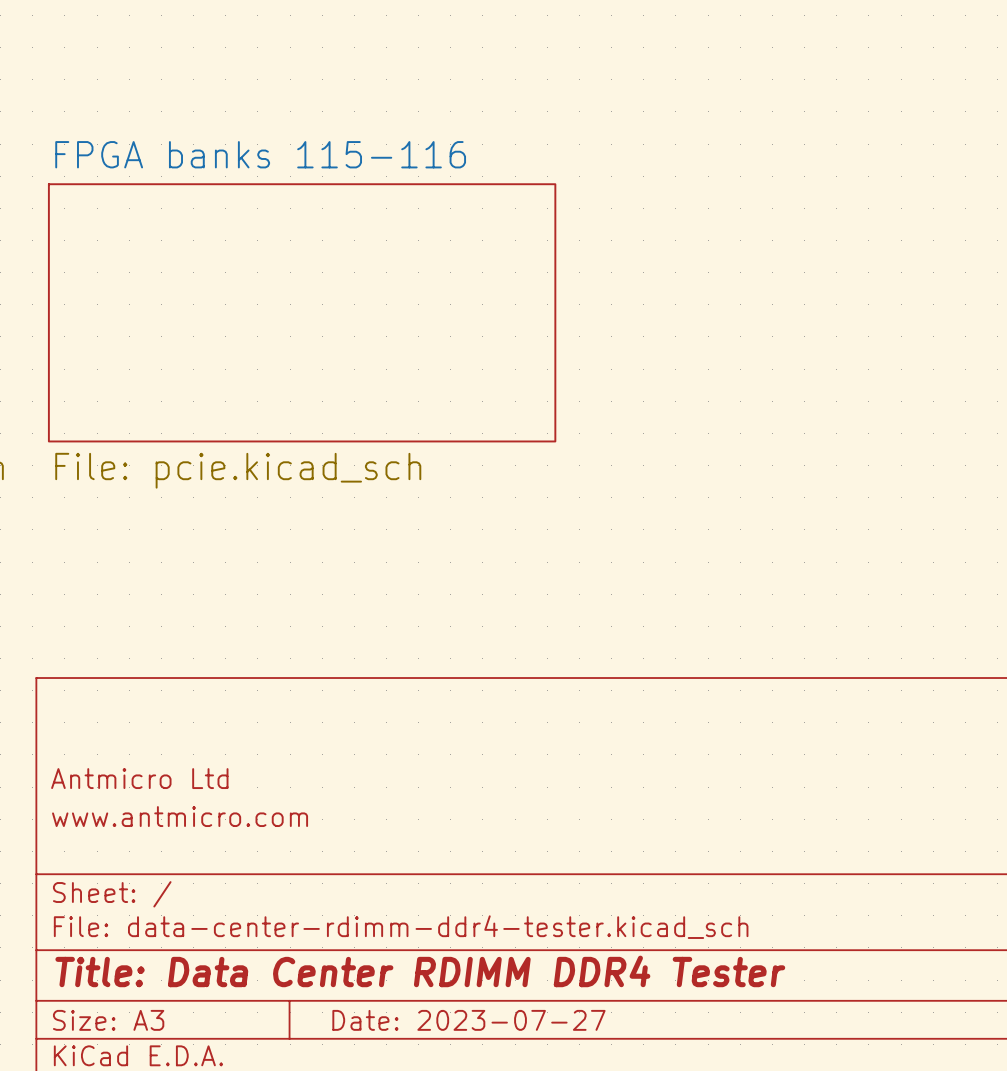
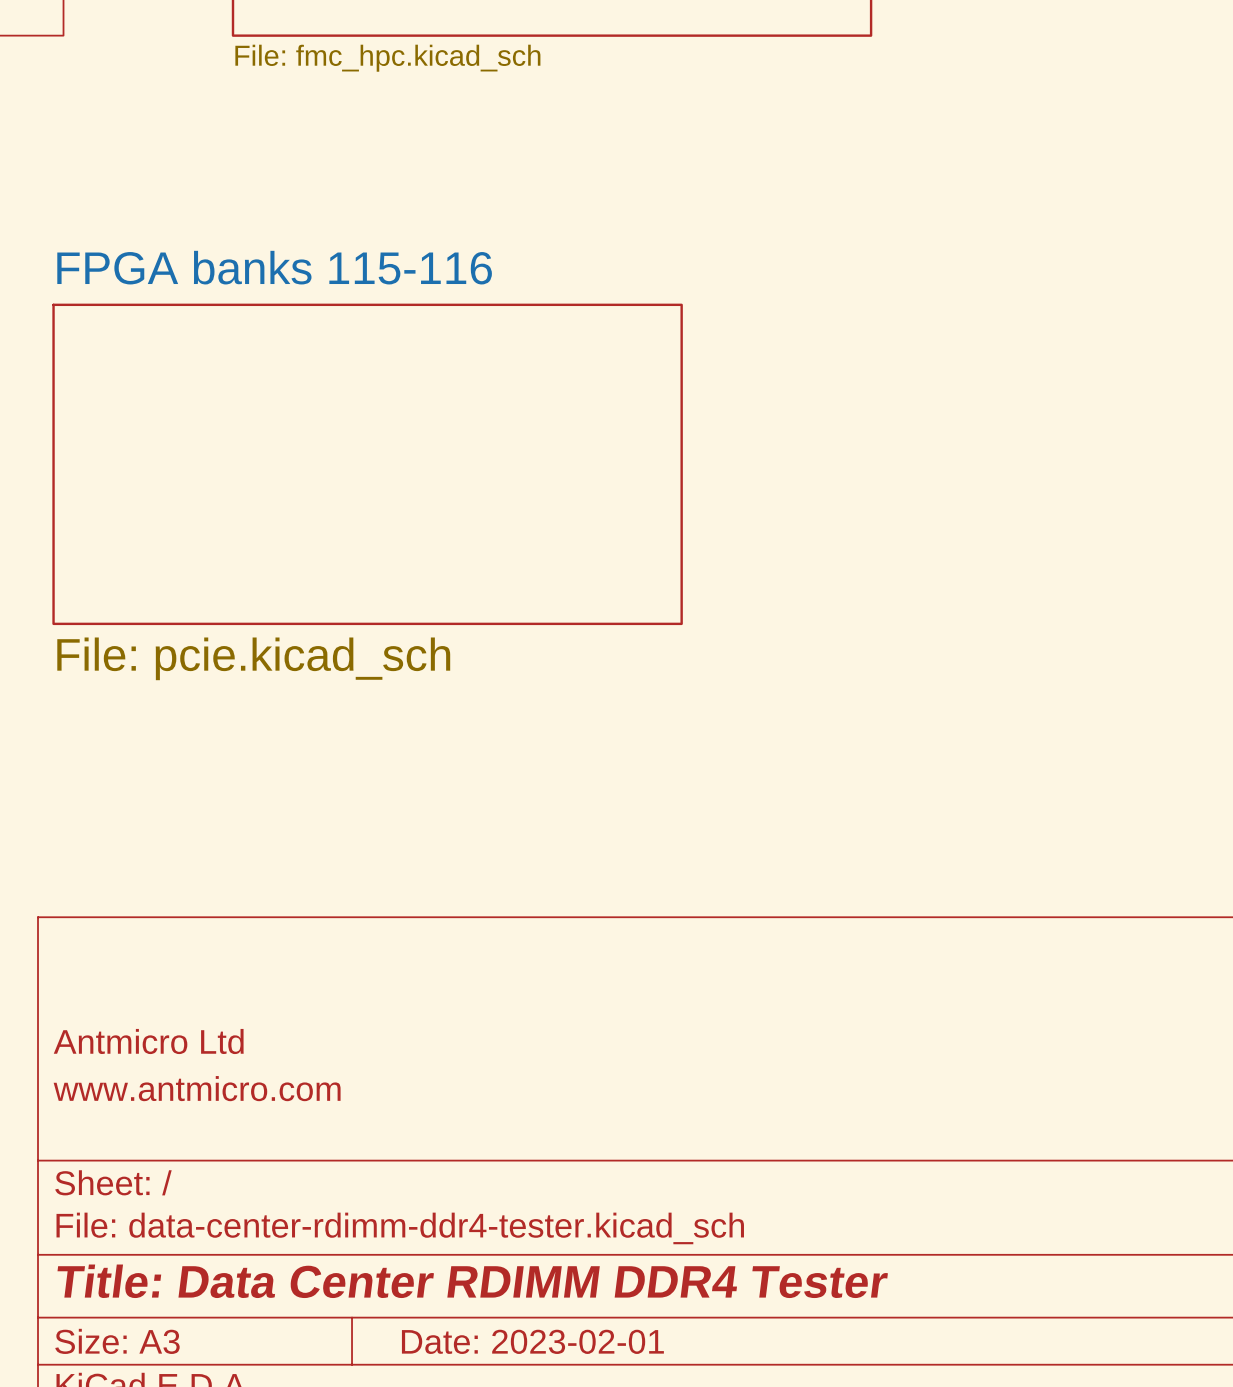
title block: Date: 2023-07-27 (468, 1020) -> Date: 2023-02-01 (532, 1341)

